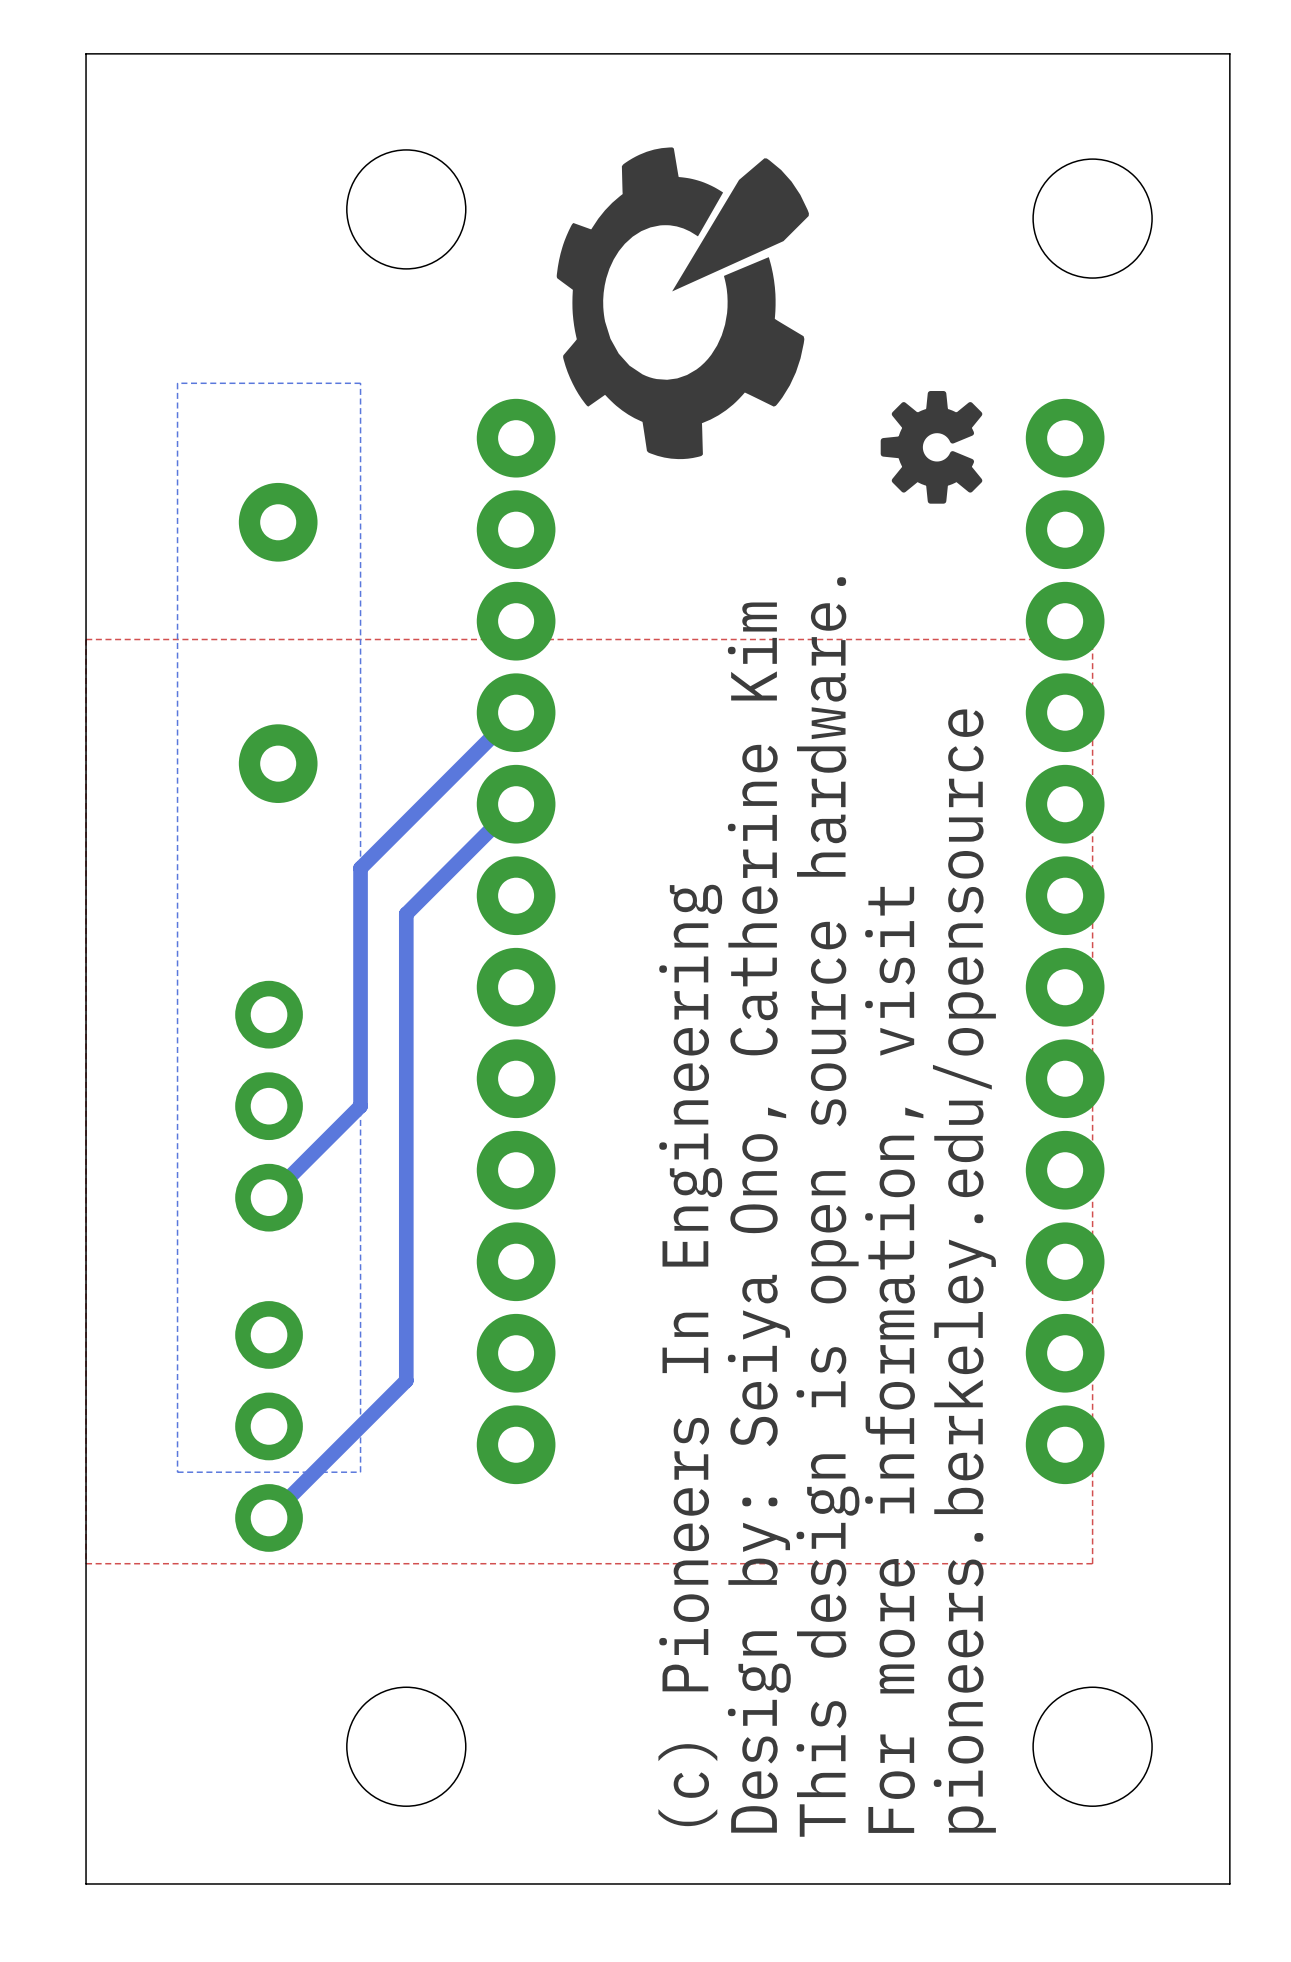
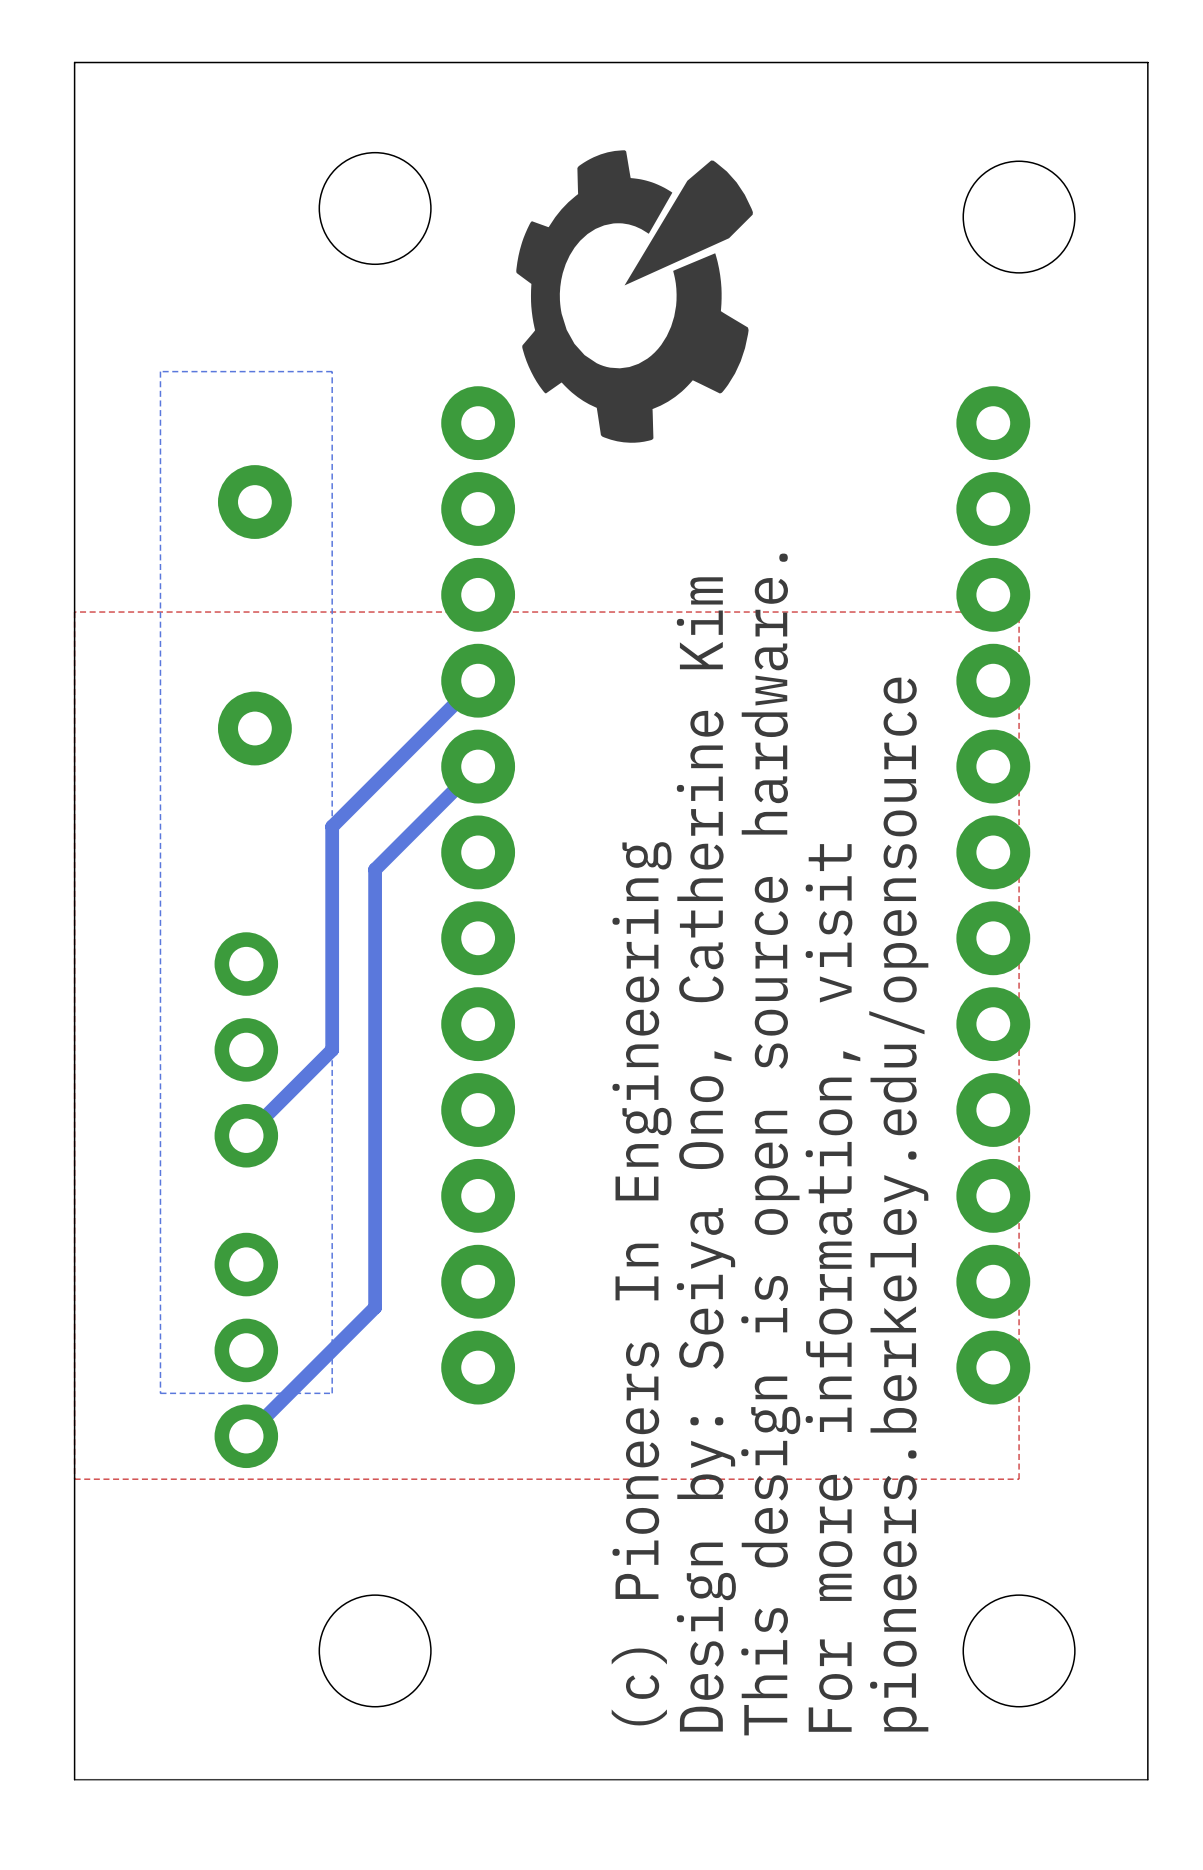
drawing: [880, 391, 983, 504] -> none
board edge: (1229, 1883) (86, 1883) -> none
line: none -> (1147, 1779) (74, 1779)

